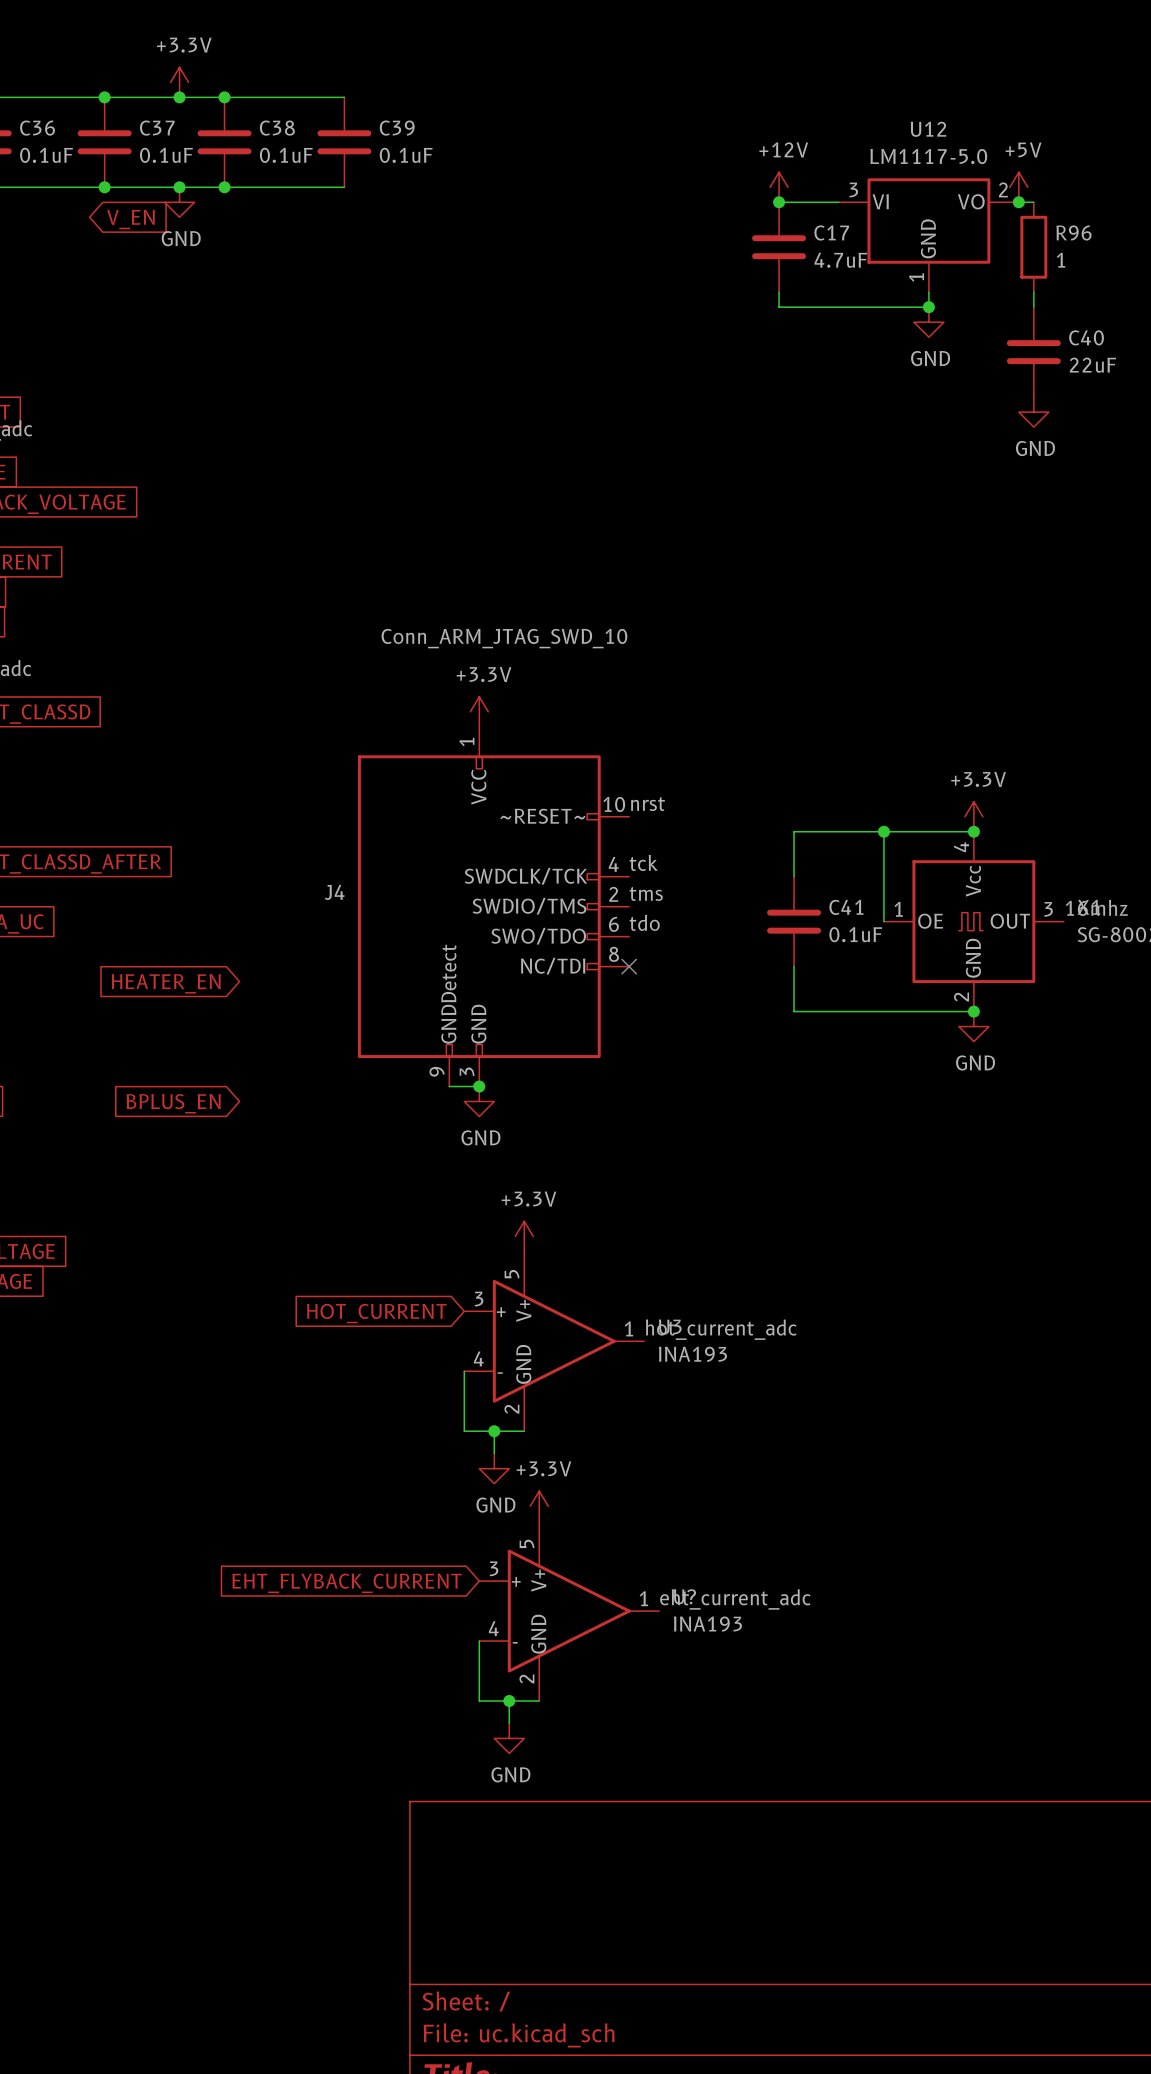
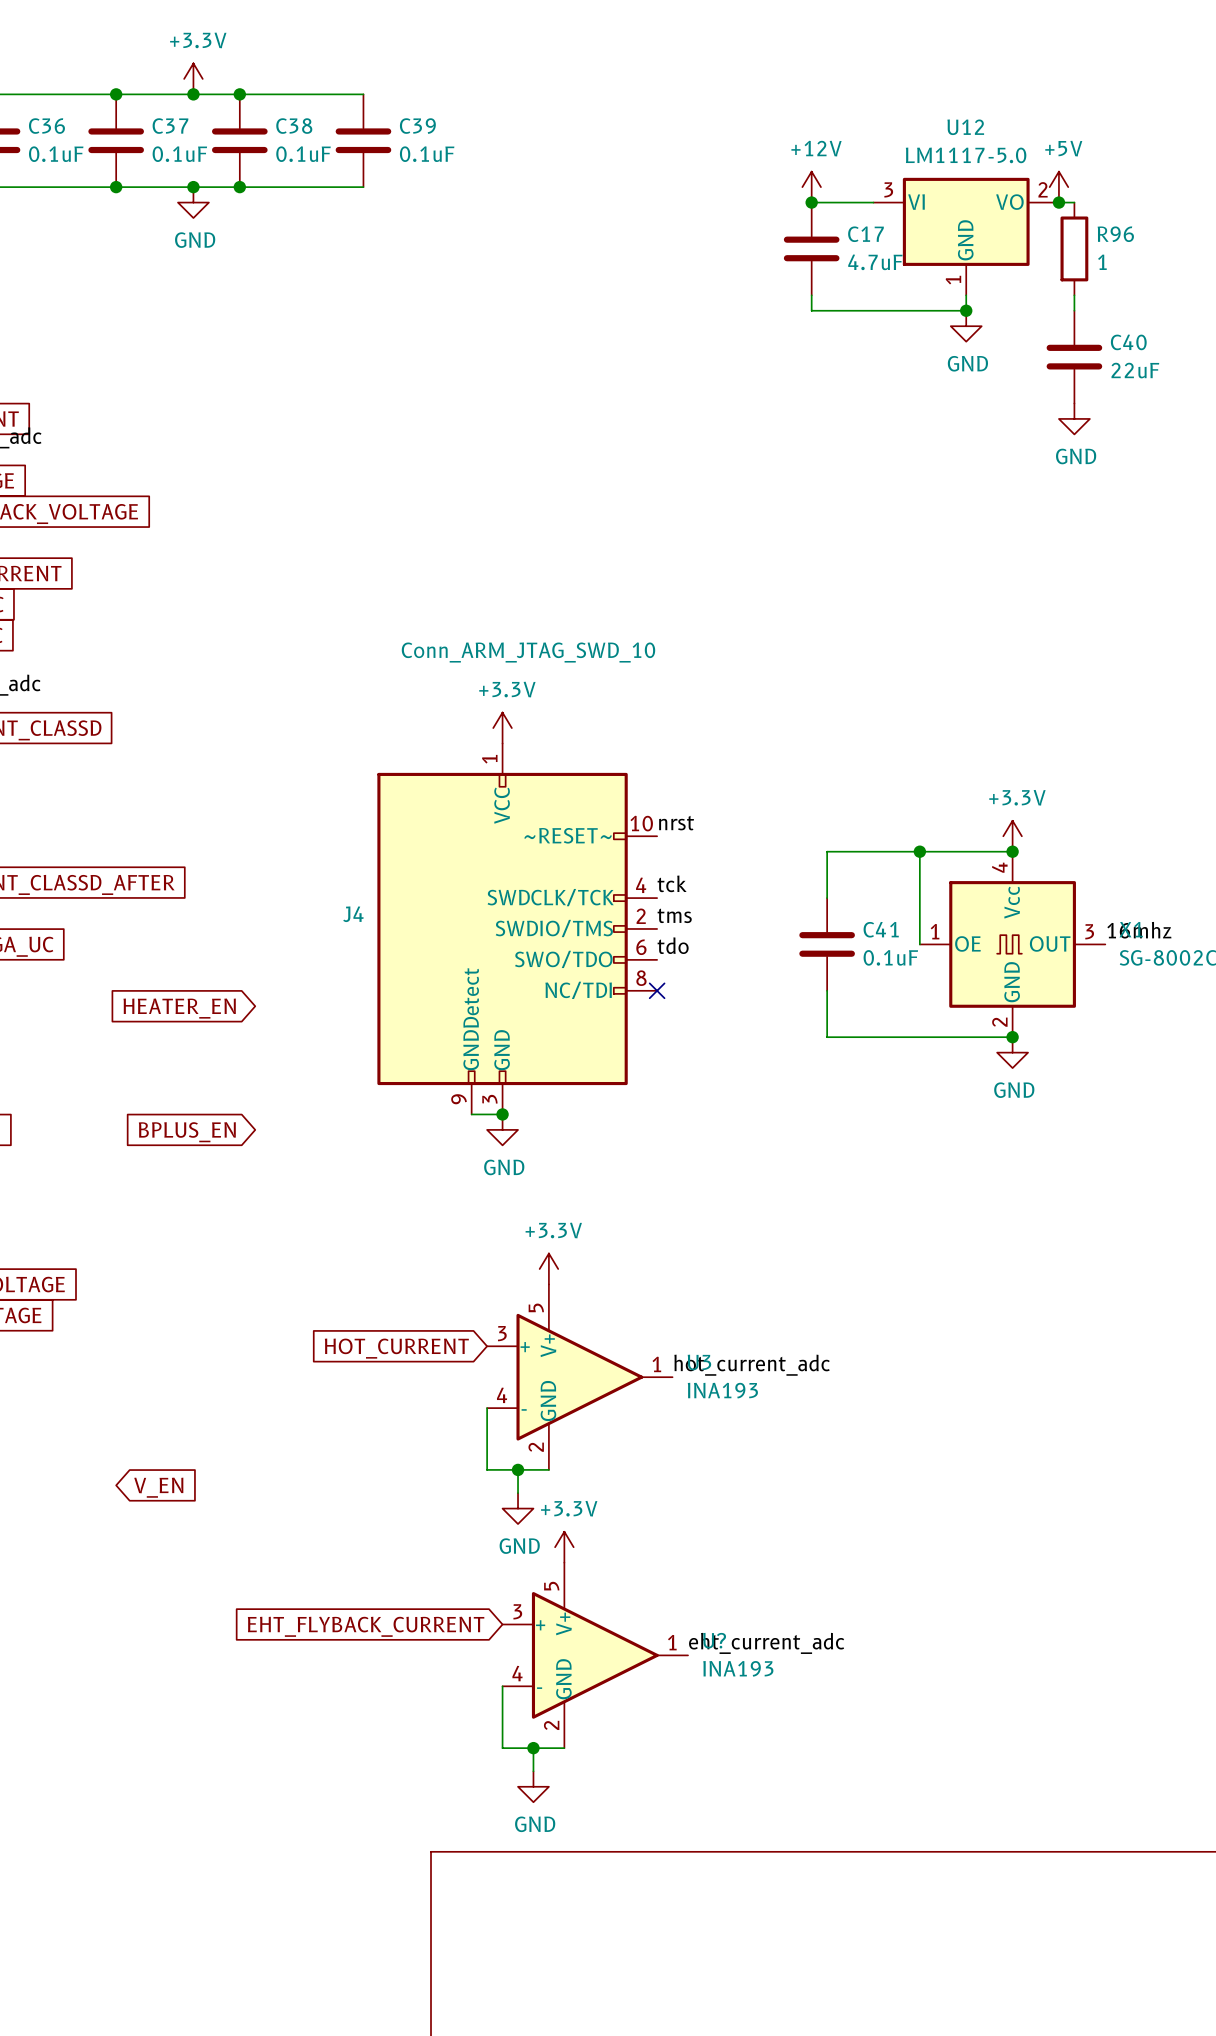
global label: V_EN (130, 219) -> none
global label: none -> V_EN (158, 1487)

